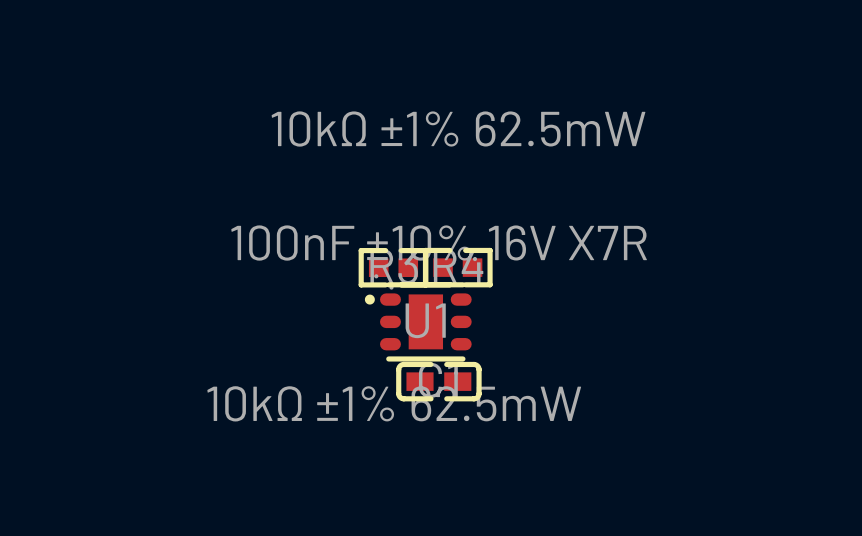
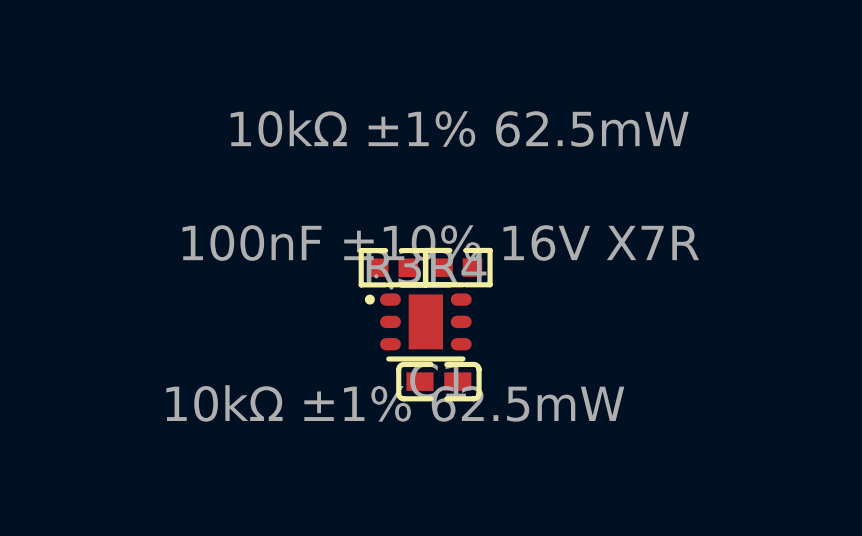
U1 name: U1 (425, 320) -> none

